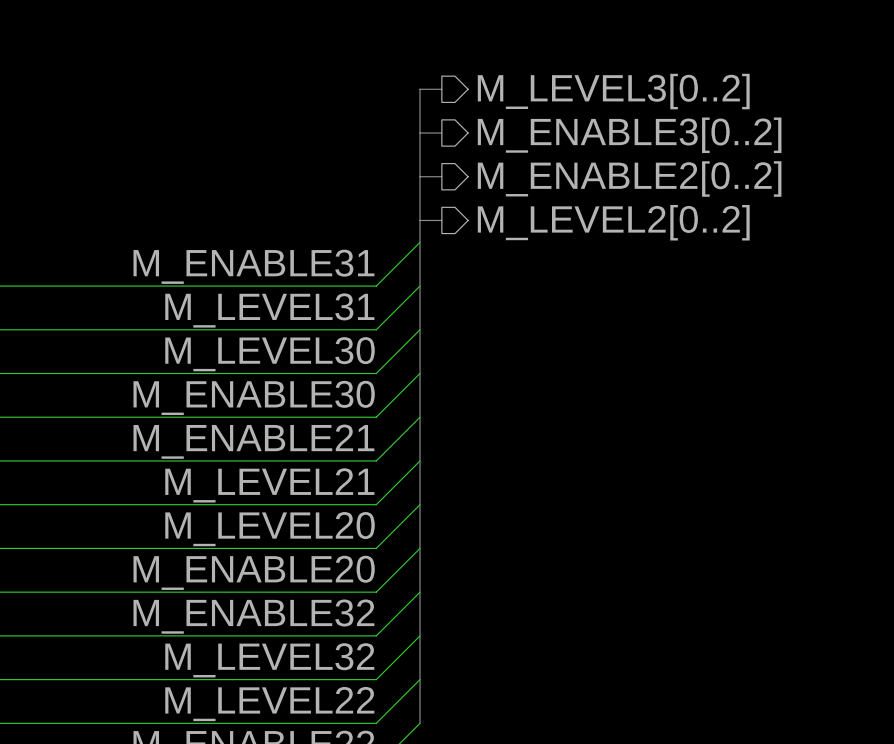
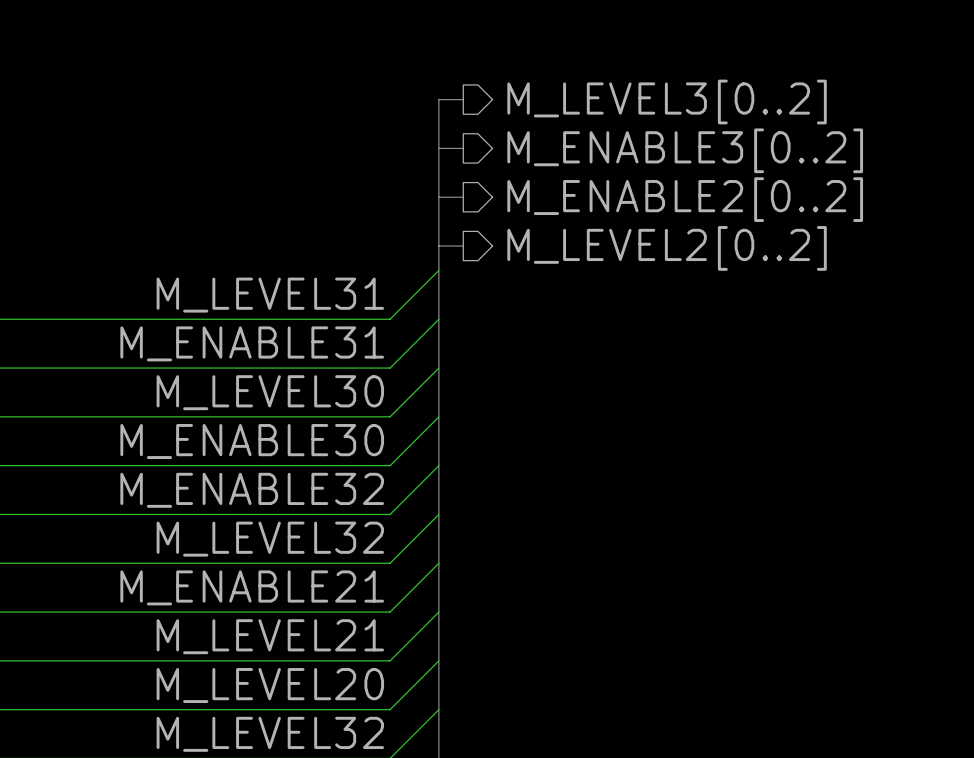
label: M_ENABLE31 (253, 266) -> M_LEVEL31 (270, 295)
label: M_LEVEL31 (269, 310) -> M_ENABLE31 (252, 343)
label: M_ENABLE21 (253, 441) -> M_ENABLE32 (252, 490)
label: M_LEVEL21 (269, 485) -> M_LEVEL32 (270, 539)
label: M_LEVEL20 (270, 529) -> M_ENABLE21 (252, 587)
label: M_ENABLE20 (254, 572) -> M_LEVEL21 (270, 636)
label: M_ENABLE32 (253, 616) -> M_LEVEL20 (270, 685)

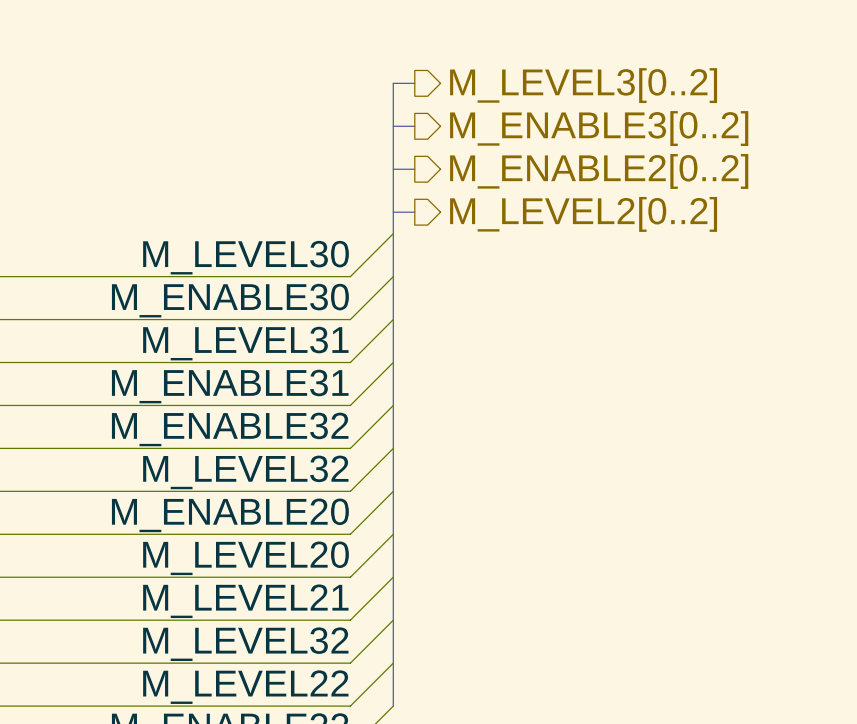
label: M_LEVEL31 (270, 295) -> M_LEVEL30 (246, 257)
label: M_ENABLE31 (252, 343) -> M_ENABLE30 (230, 300)
label: M_LEVEL30 (270, 392) -> M_LEVEL31 (245, 343)
label: M_ENABLE30 (252, 441) -> M_ENABLE31 (230, 386)
label: M_ENABLE21 (252, 587) -> M_ENABLE20 (230, 515)
label: M_LEVEL21 (270, 636) -> M_LEVEL20 (246, 558)
label: M_LEVEL20 (270, 685) -> M_LEVEL21 (245, 601)

